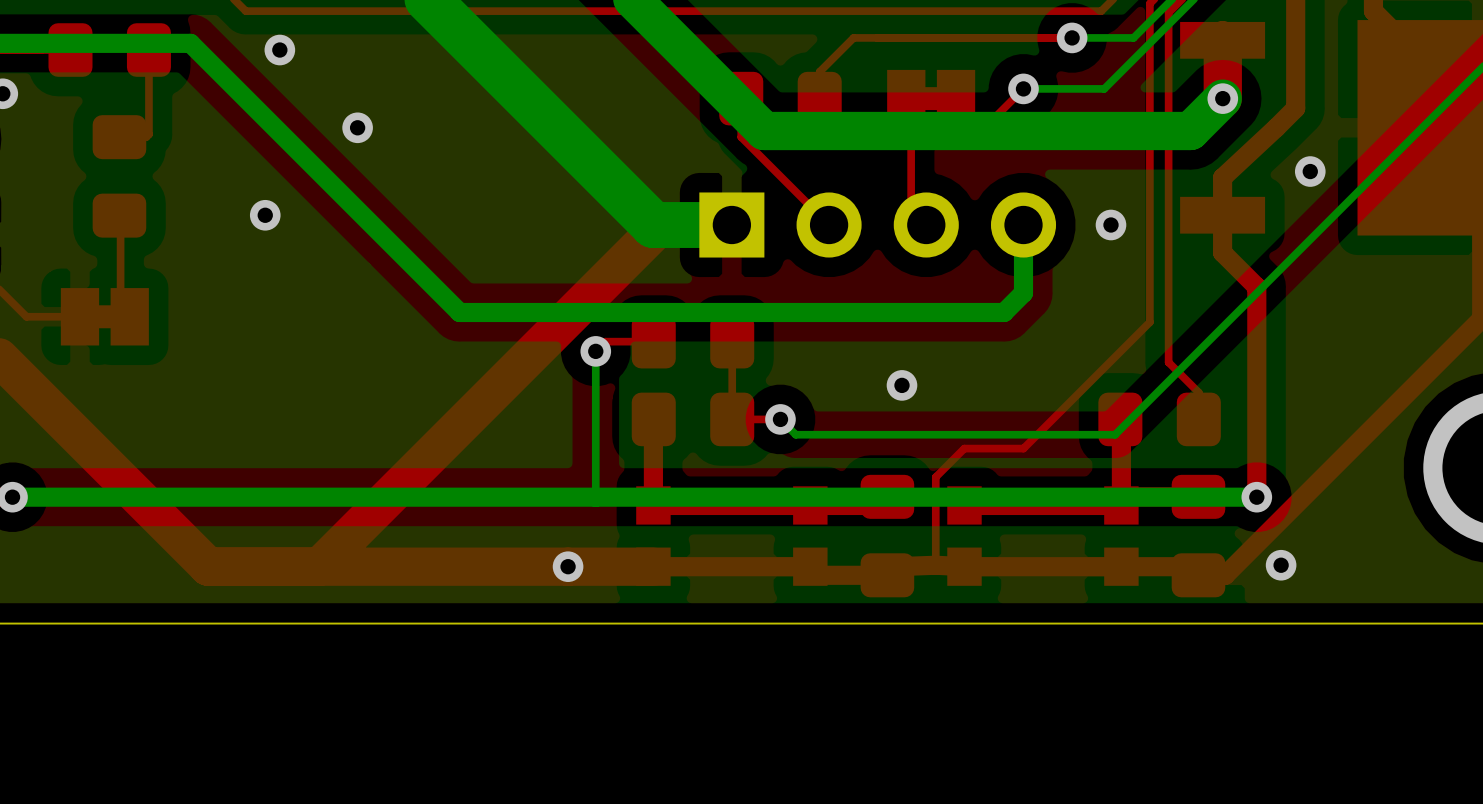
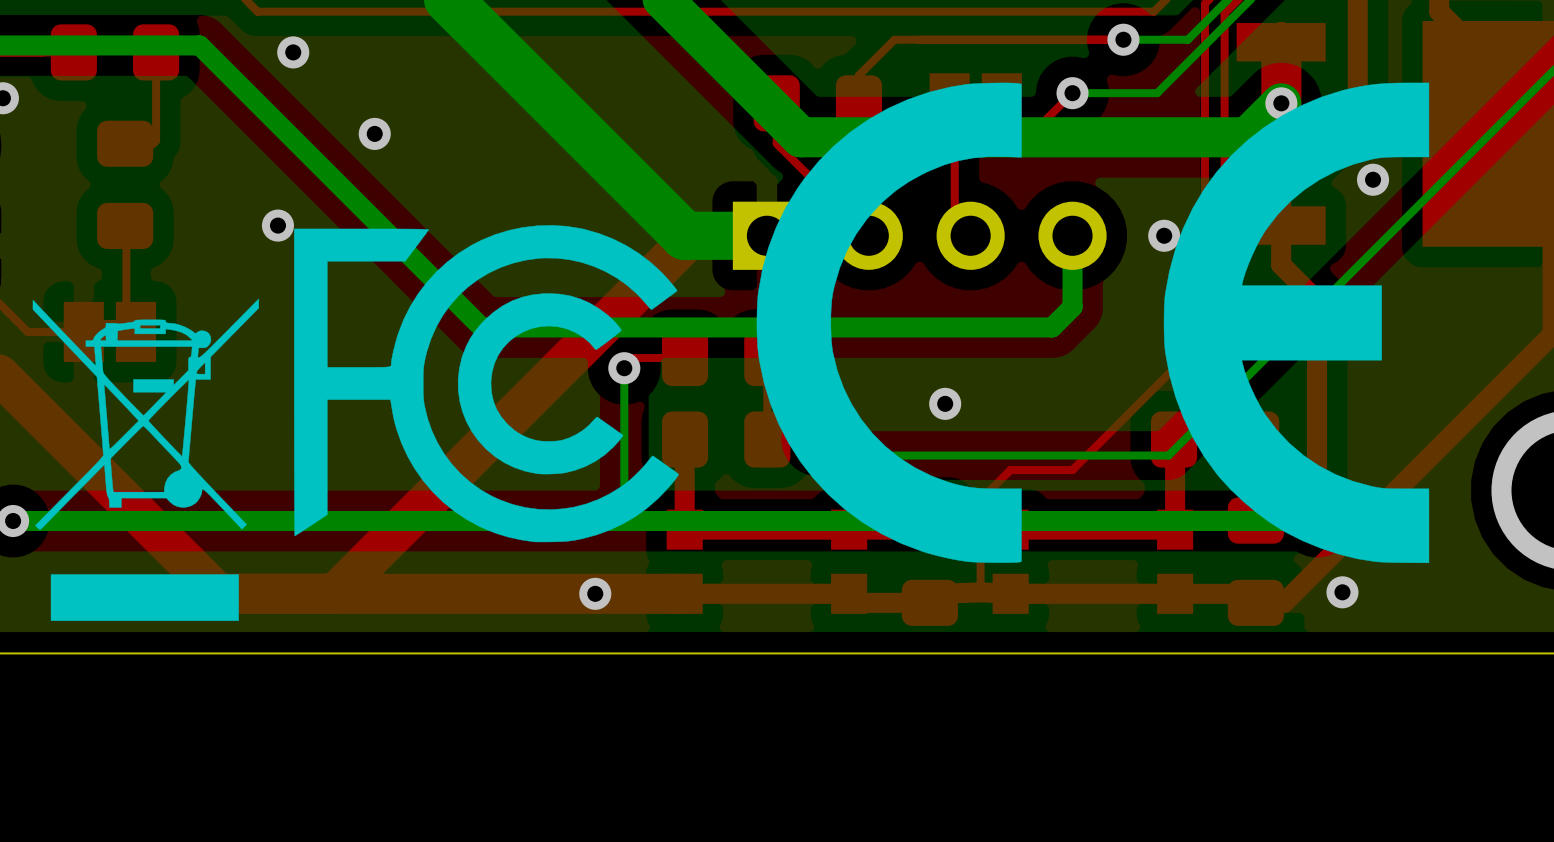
drawing: none -> [756, 82, 1430, 564]
drawing: none -> [32, 225, 679, 621]

